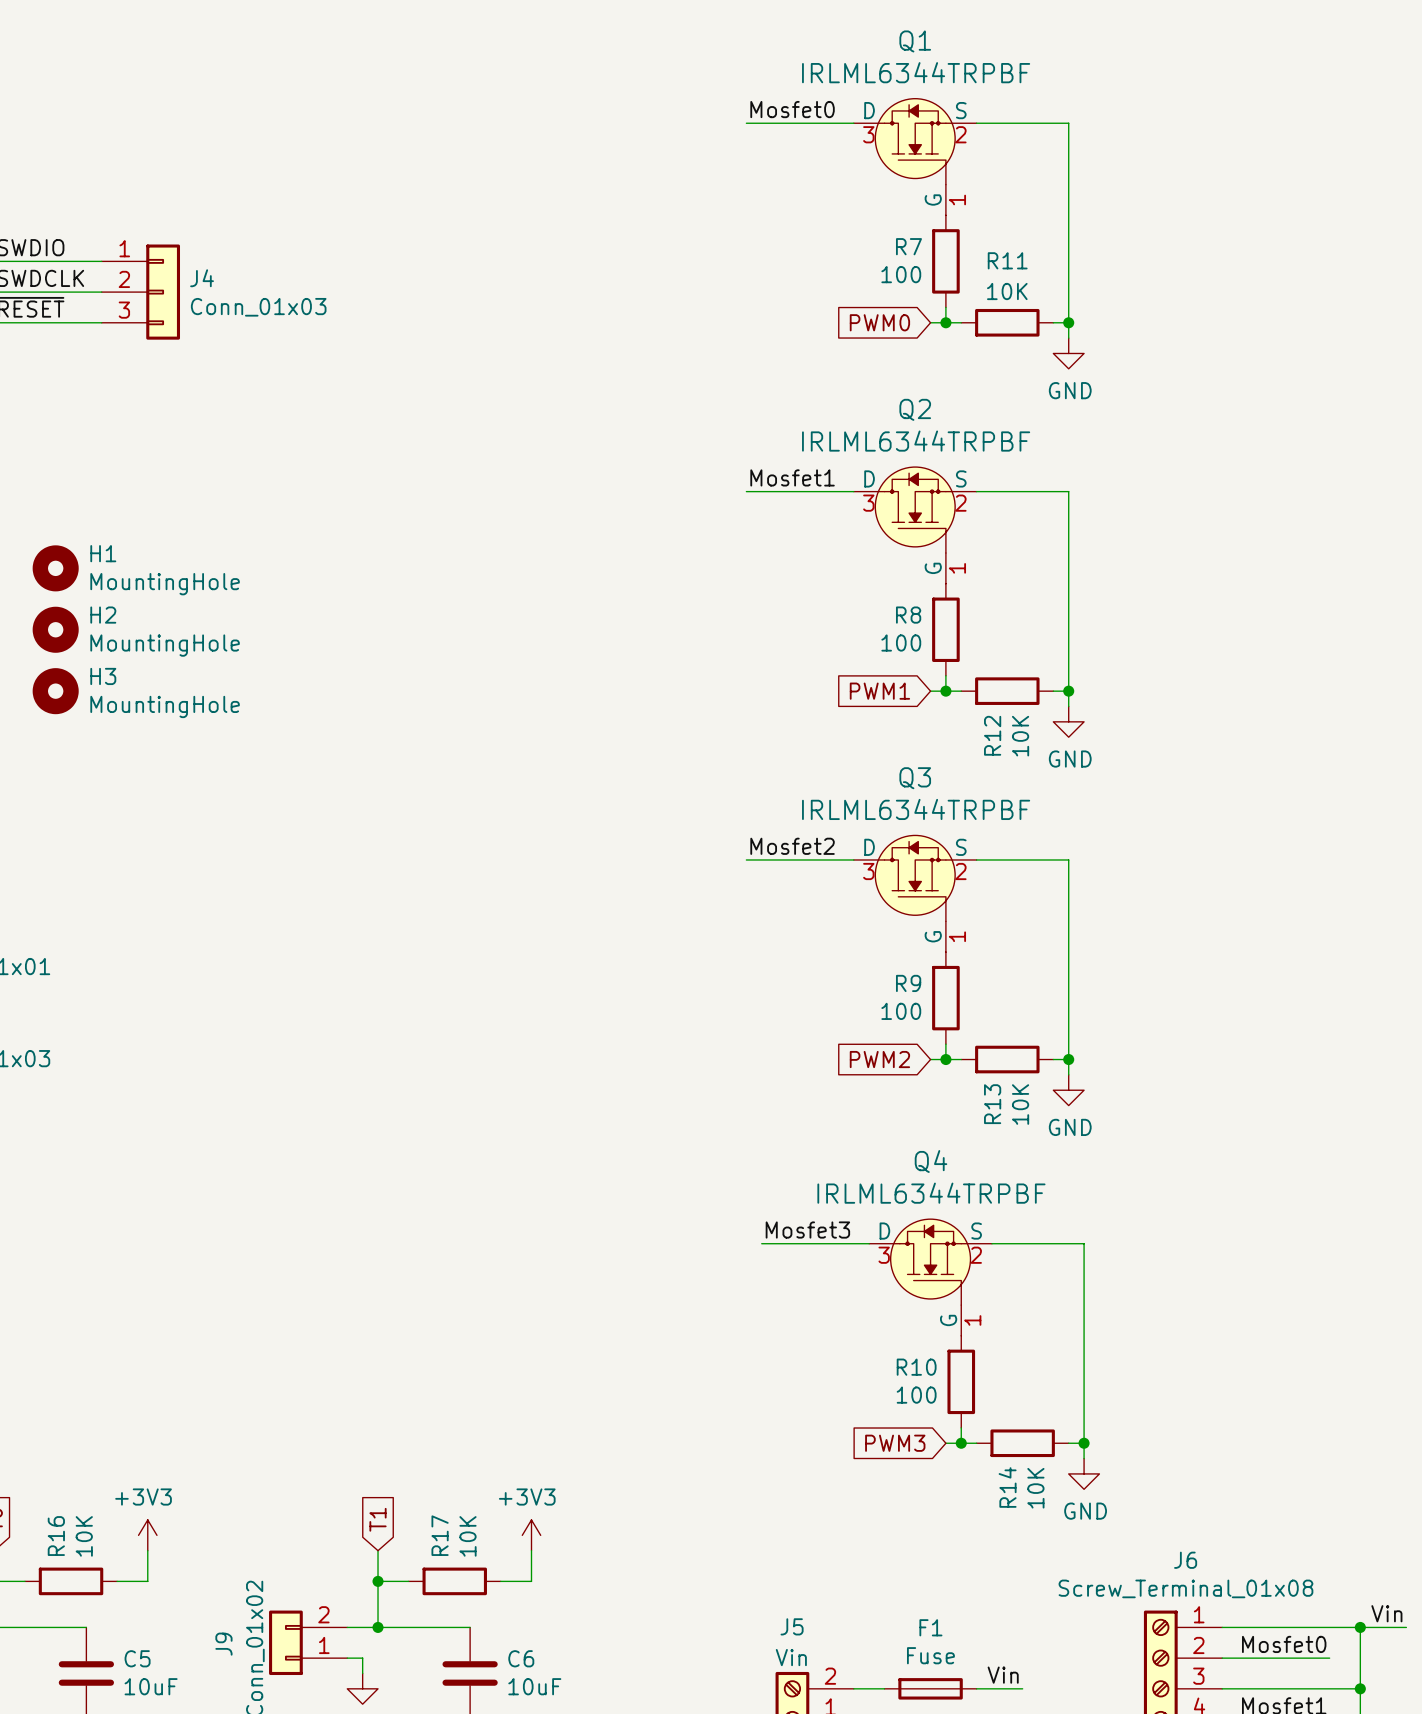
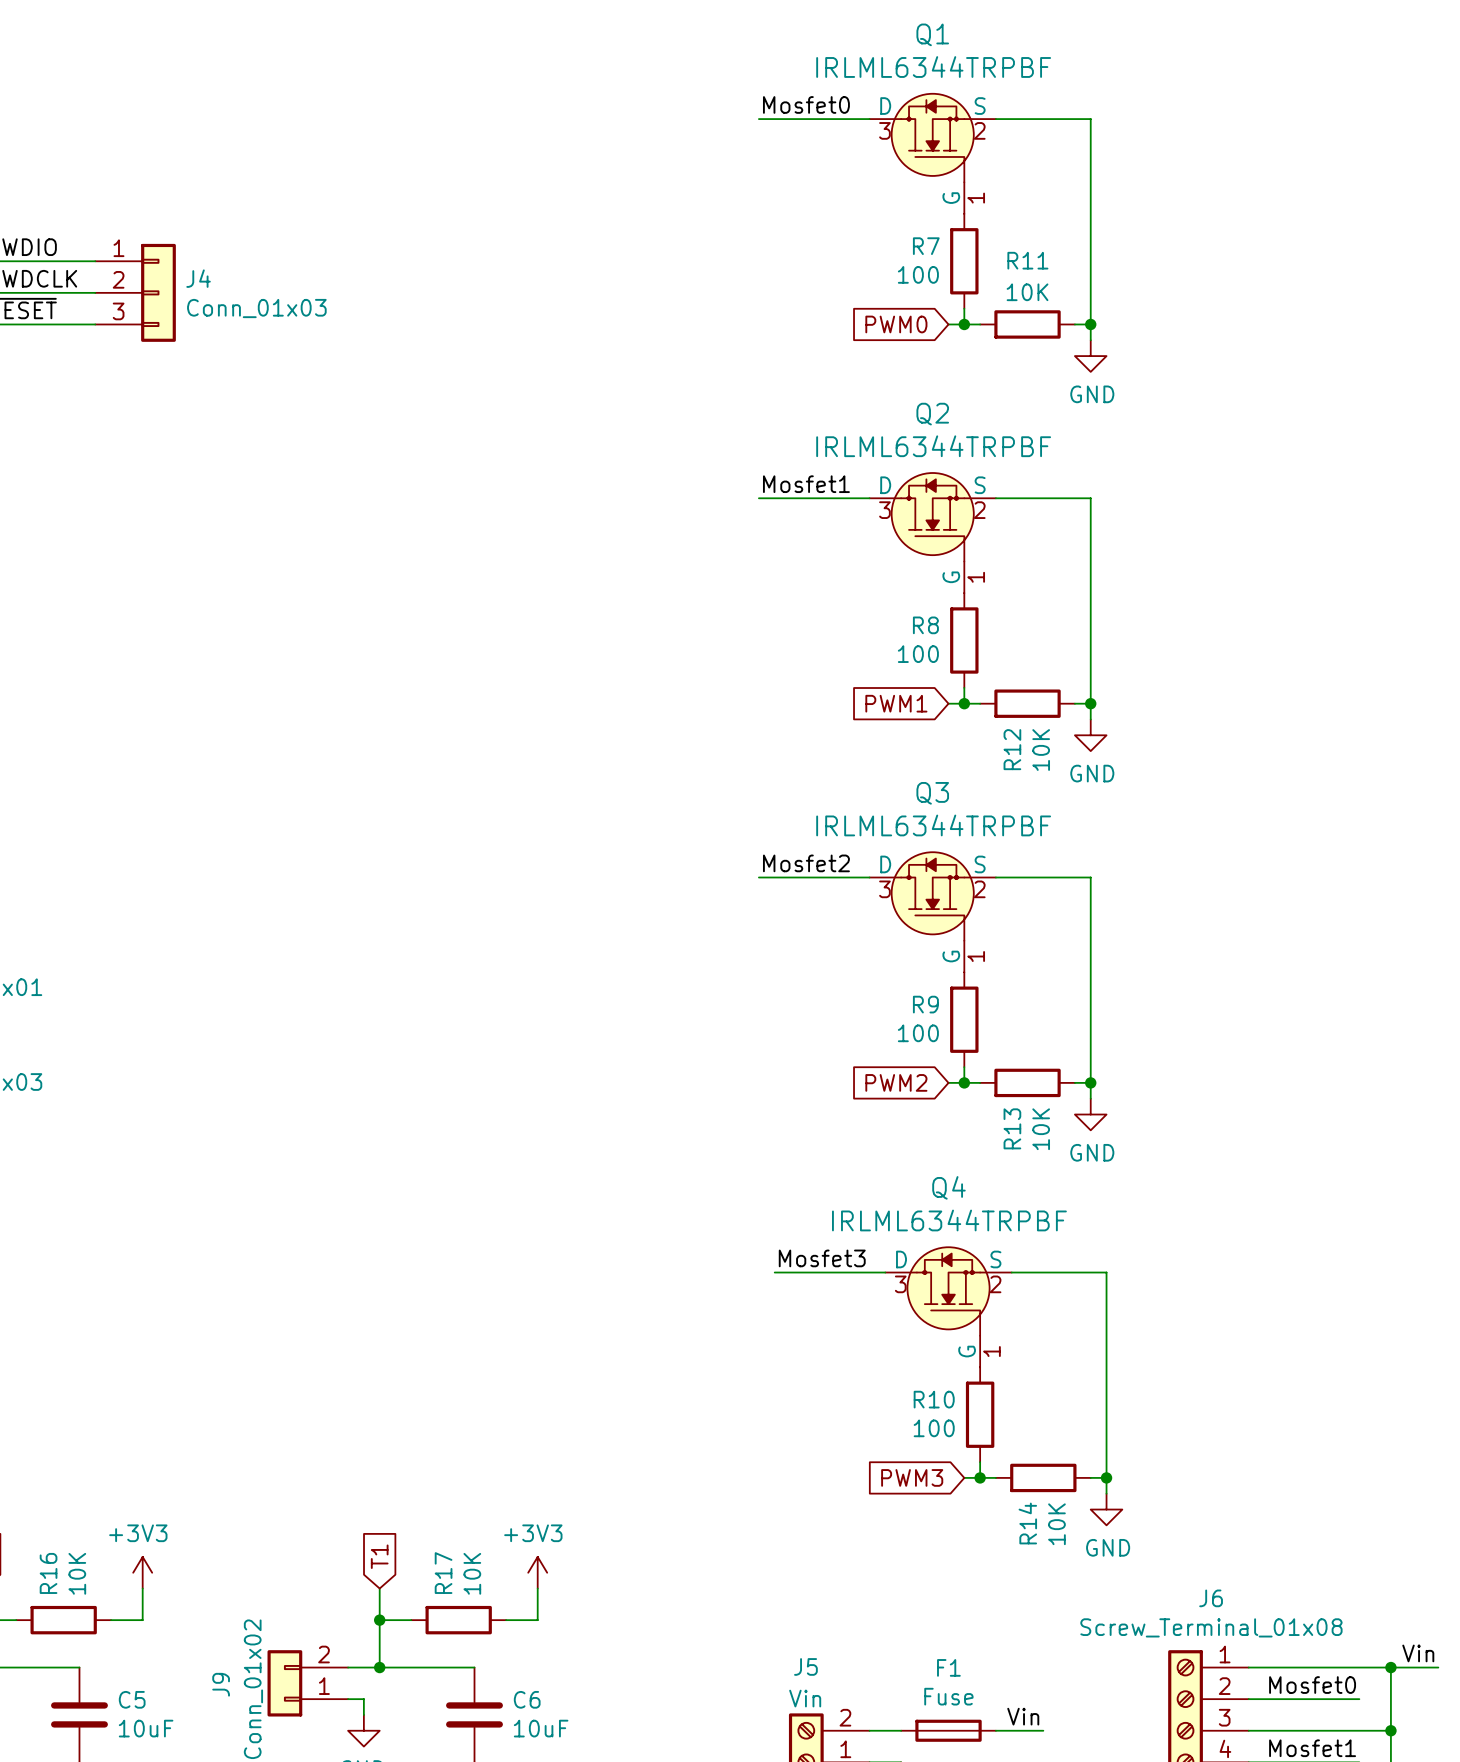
H1: MountingHole (55, 568) -> none
H2: MountingHole (55, 629) -> none
H3: MountingHole (55, 691) -> none

